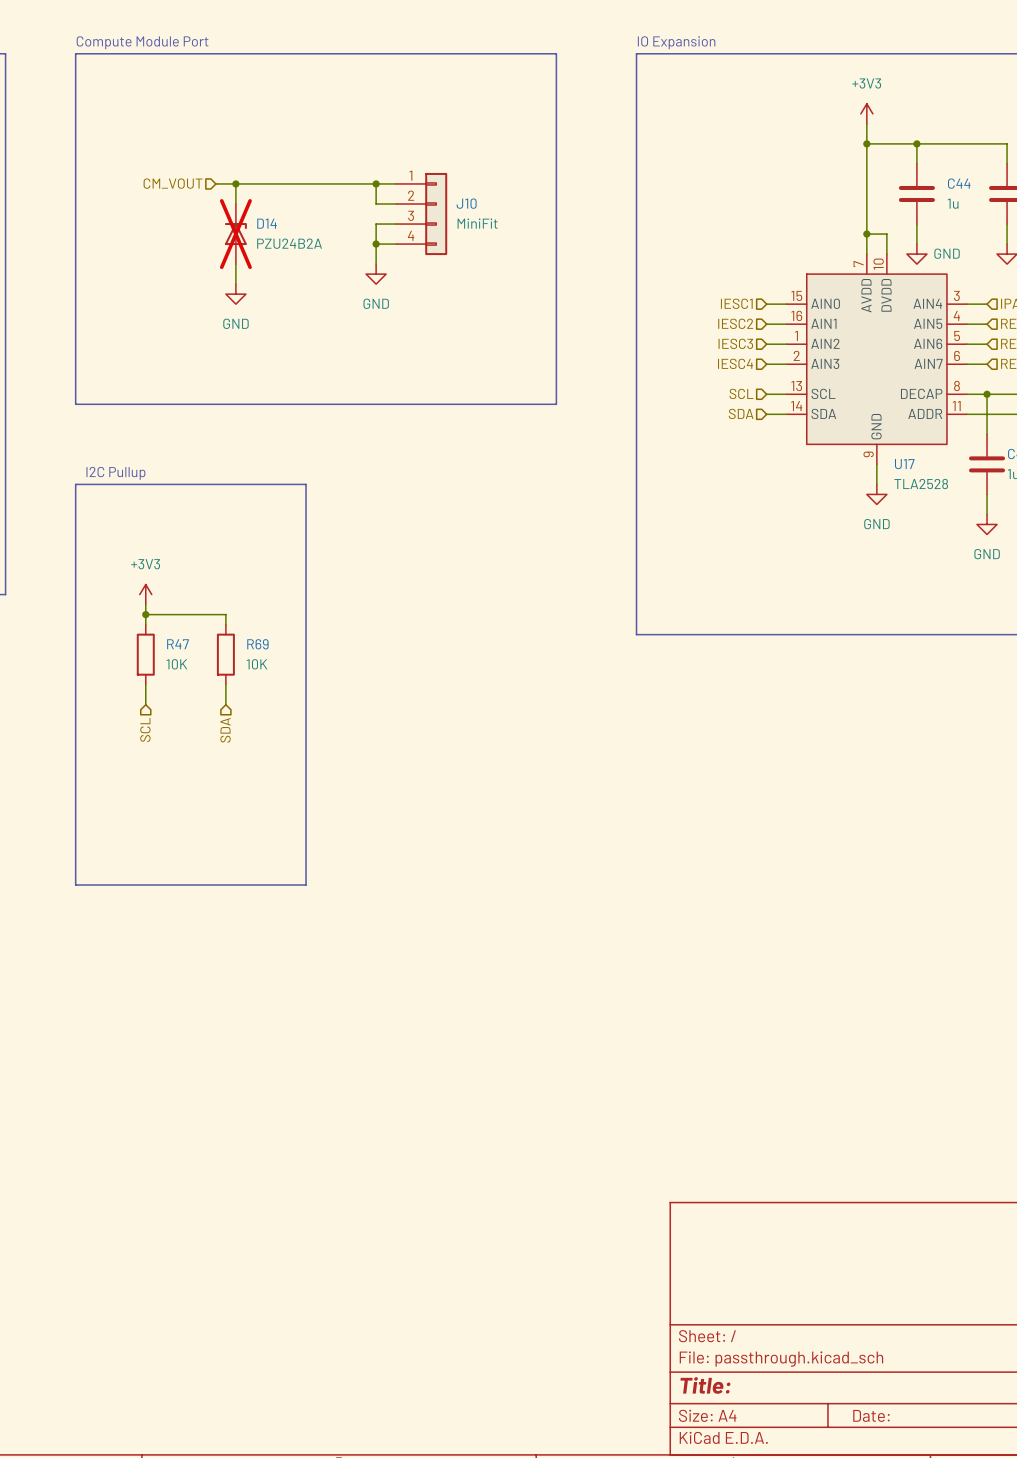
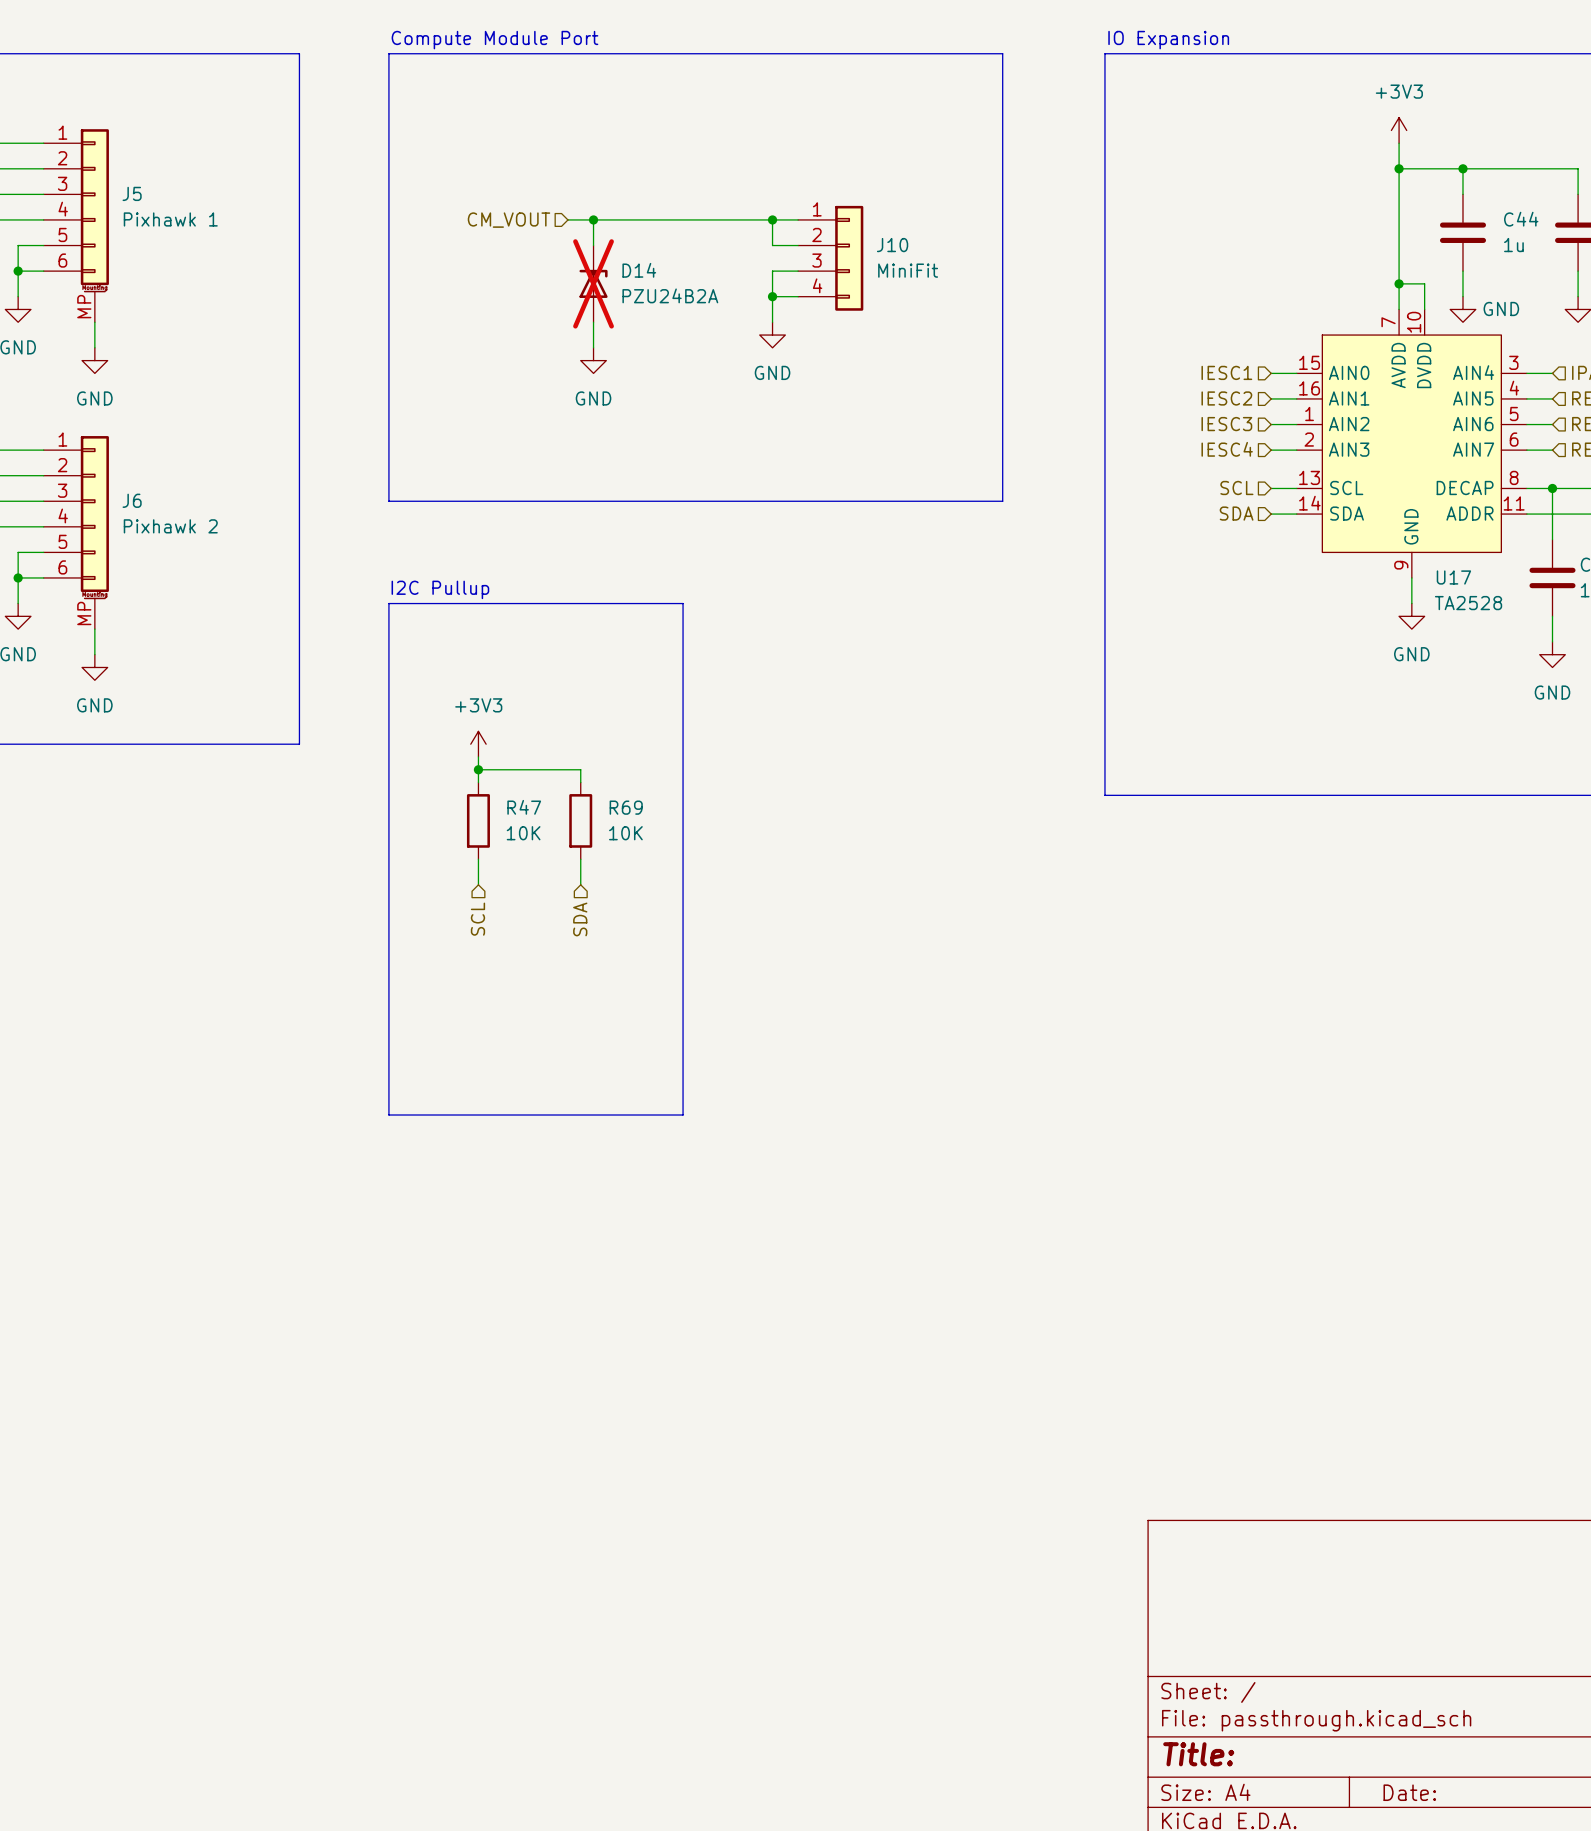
U17 value: TLA2528 (921, 484) -> TA2528 (1468, 603)

